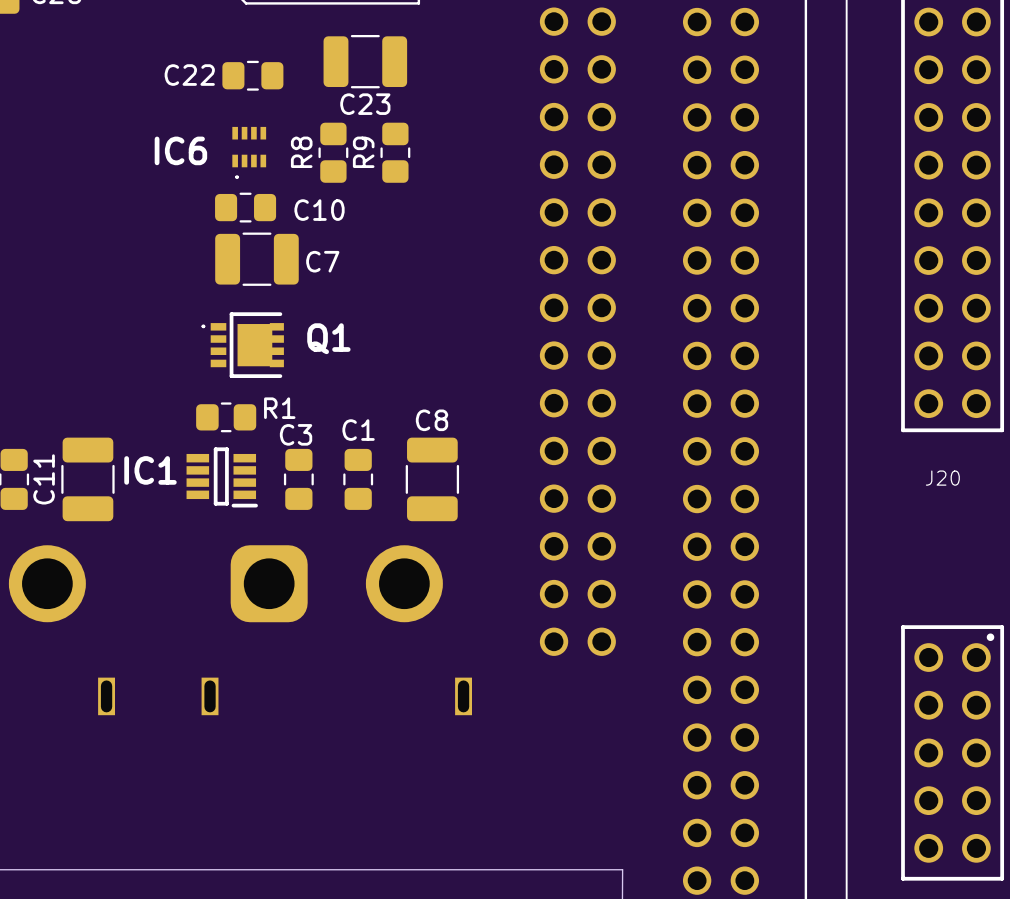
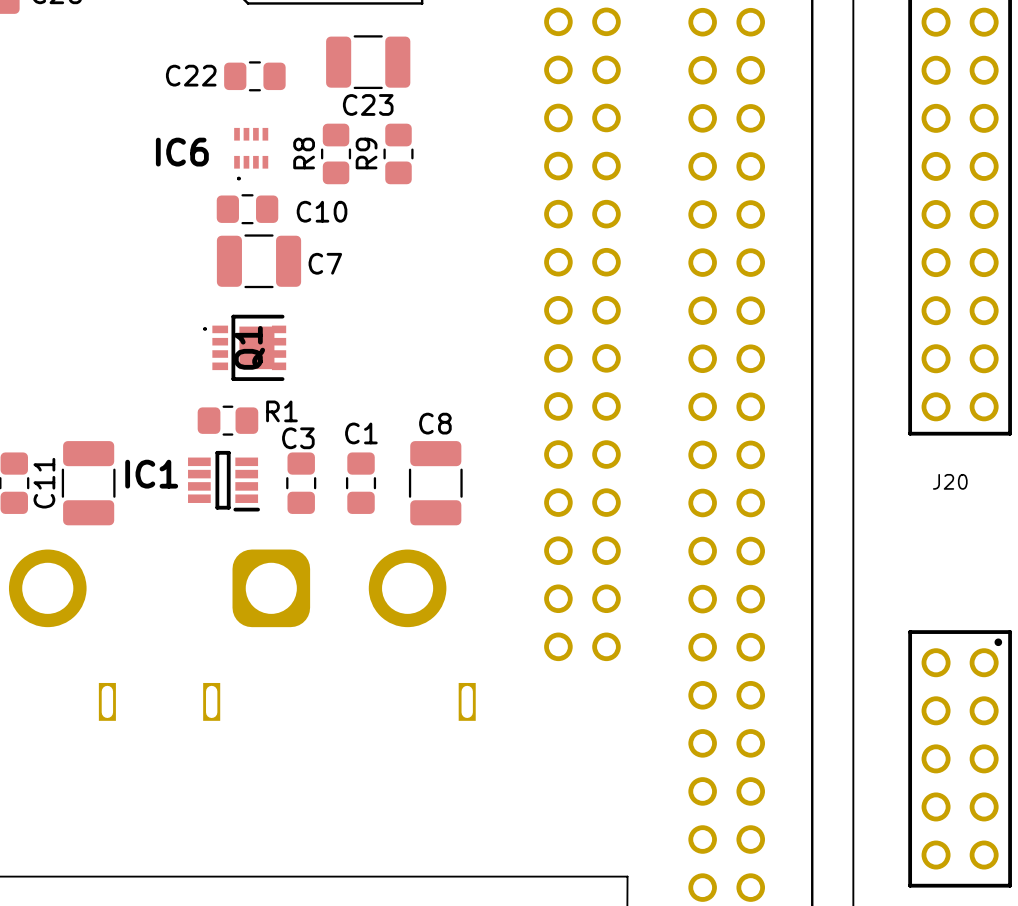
Q1 name rotation: 0° (328, 338) -> 90° counterclockwise (249, 347)
Q1 name position: Q1 (328, 338) -> Q1 (249, 347)

